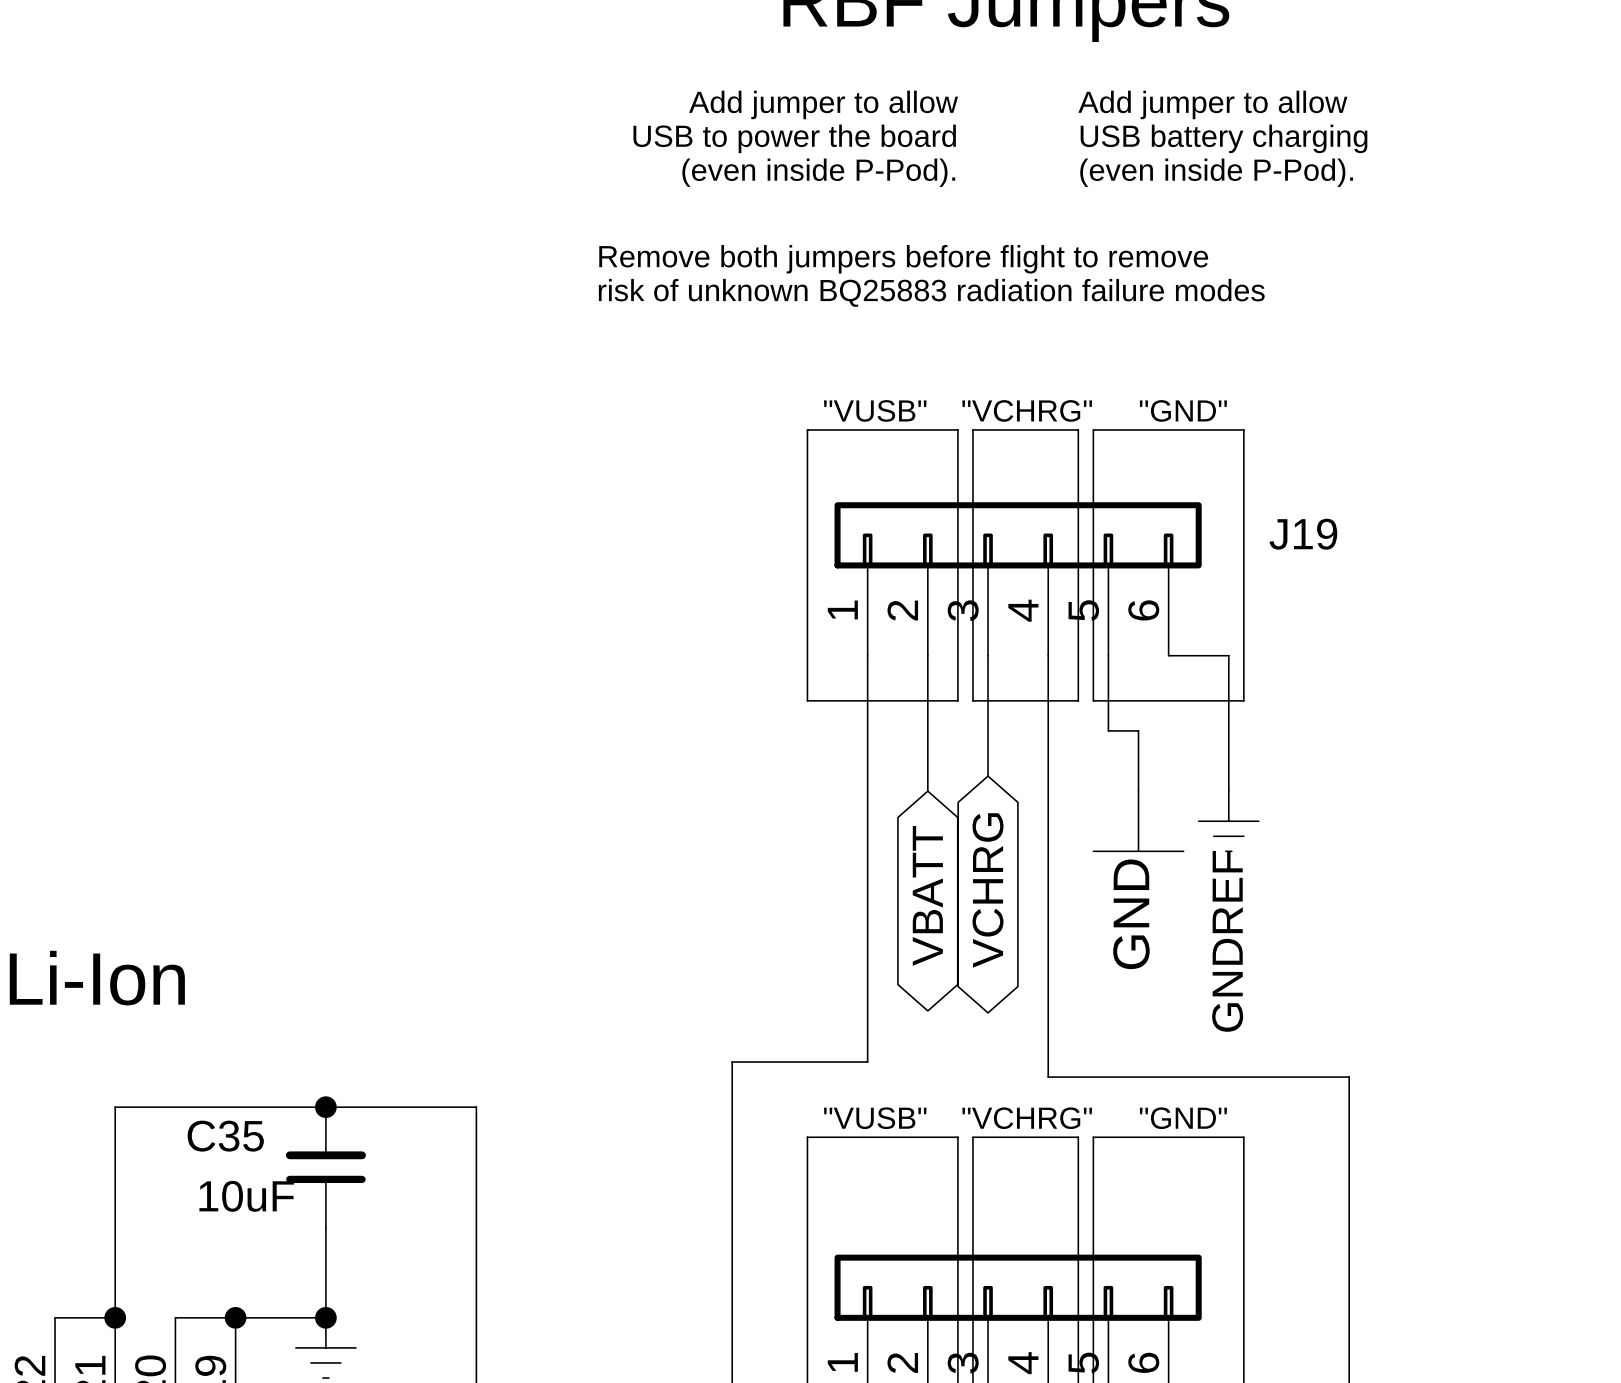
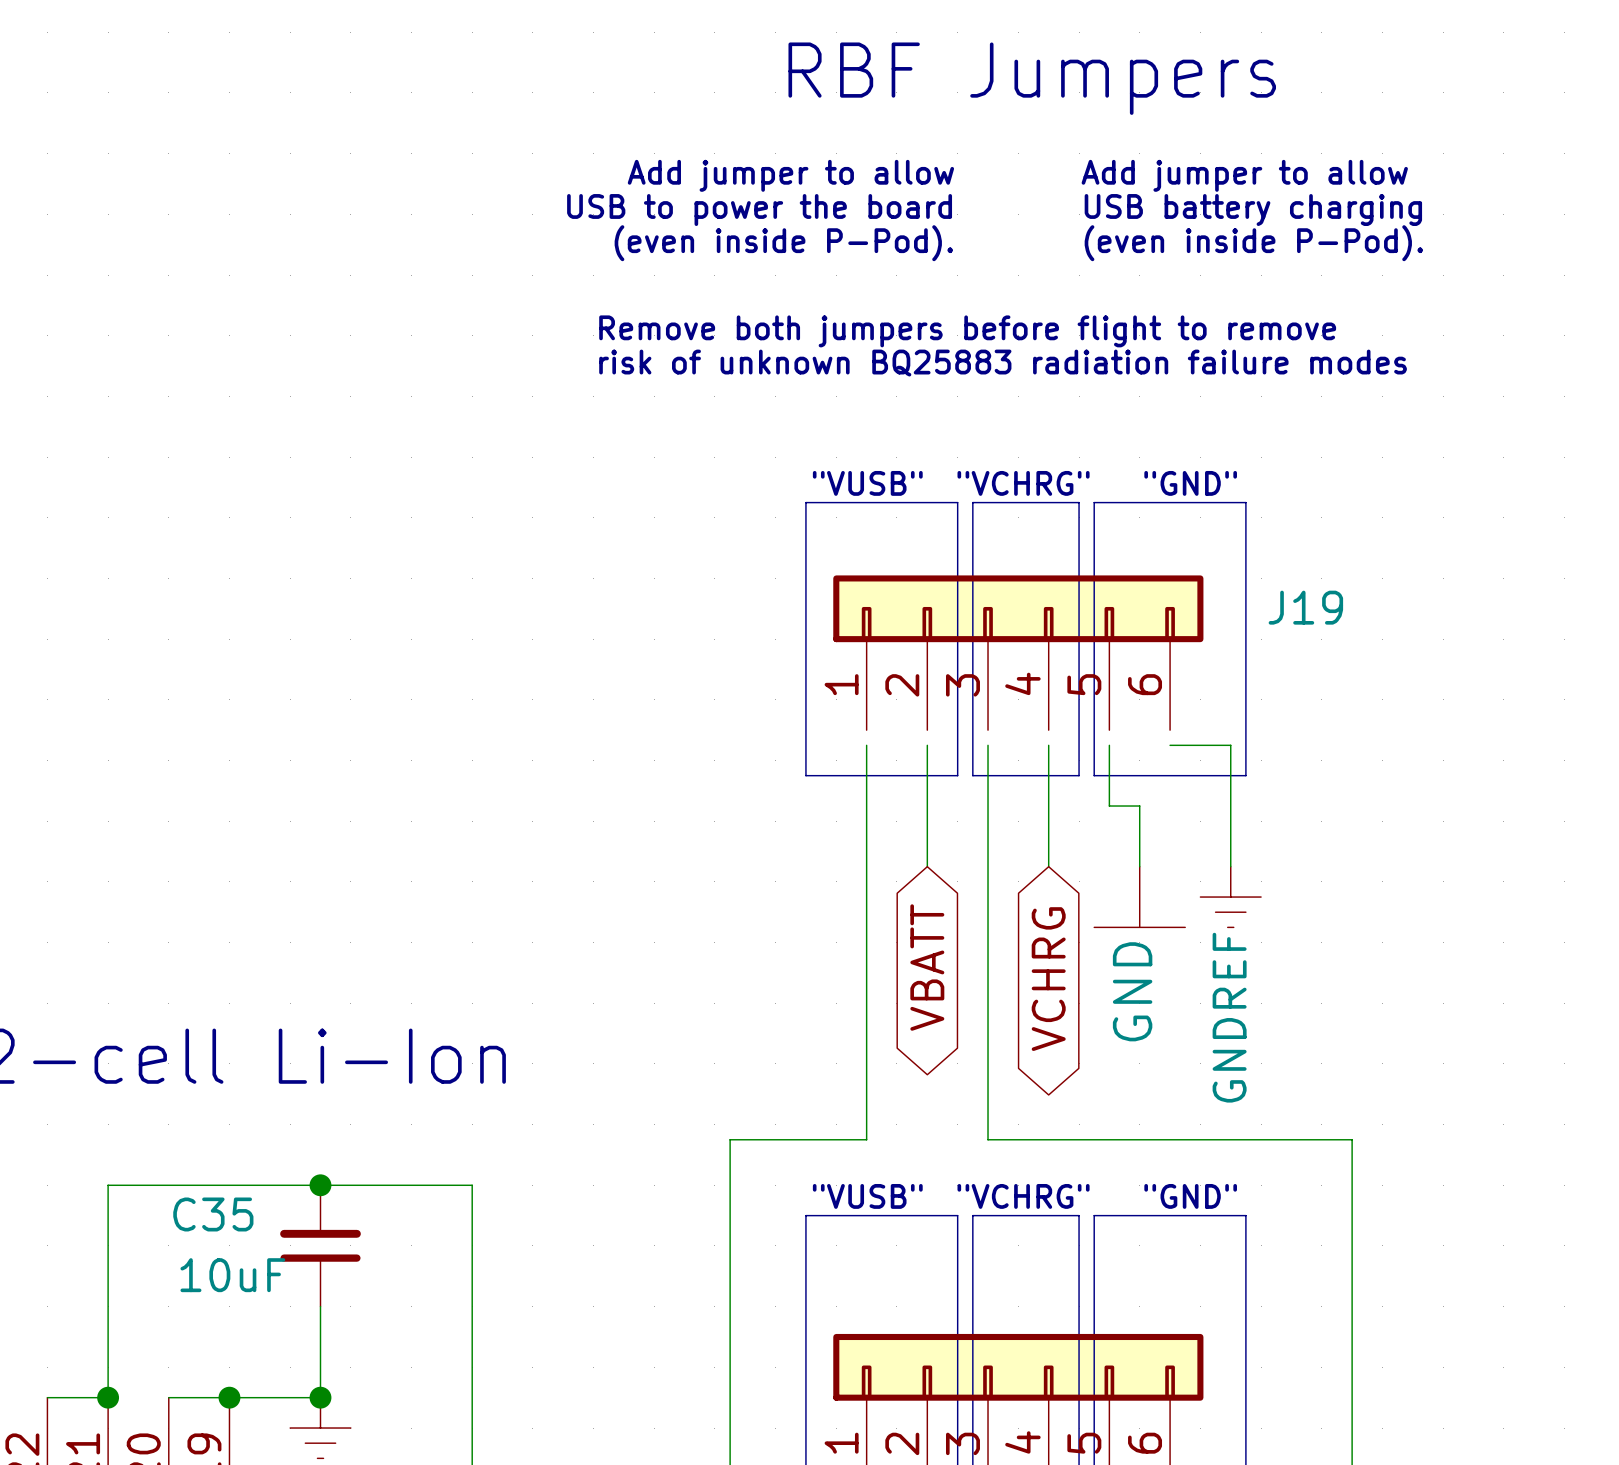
wire: (867, 655) (867, 670) -> none
wire: (927, 655) (927, 670) -> none
wire: (988, 655) (988, 670) -> none
wire: (1048, 655) (1048, 670) -> none
wire: (1108, 655) (1108, 670) -> none
wire: (1168, 655) (1228, 655) (1228, 670) -> (1170, 745) (1230, 745)
wire: (1048, 791) (1048, 1077) (1349, 1077) -> (988, 851) (988, 1139) (1352, 1139) (1352, 1154)
global label position: VCHRG (988, 890) -> VCHRG (1048, 979)

